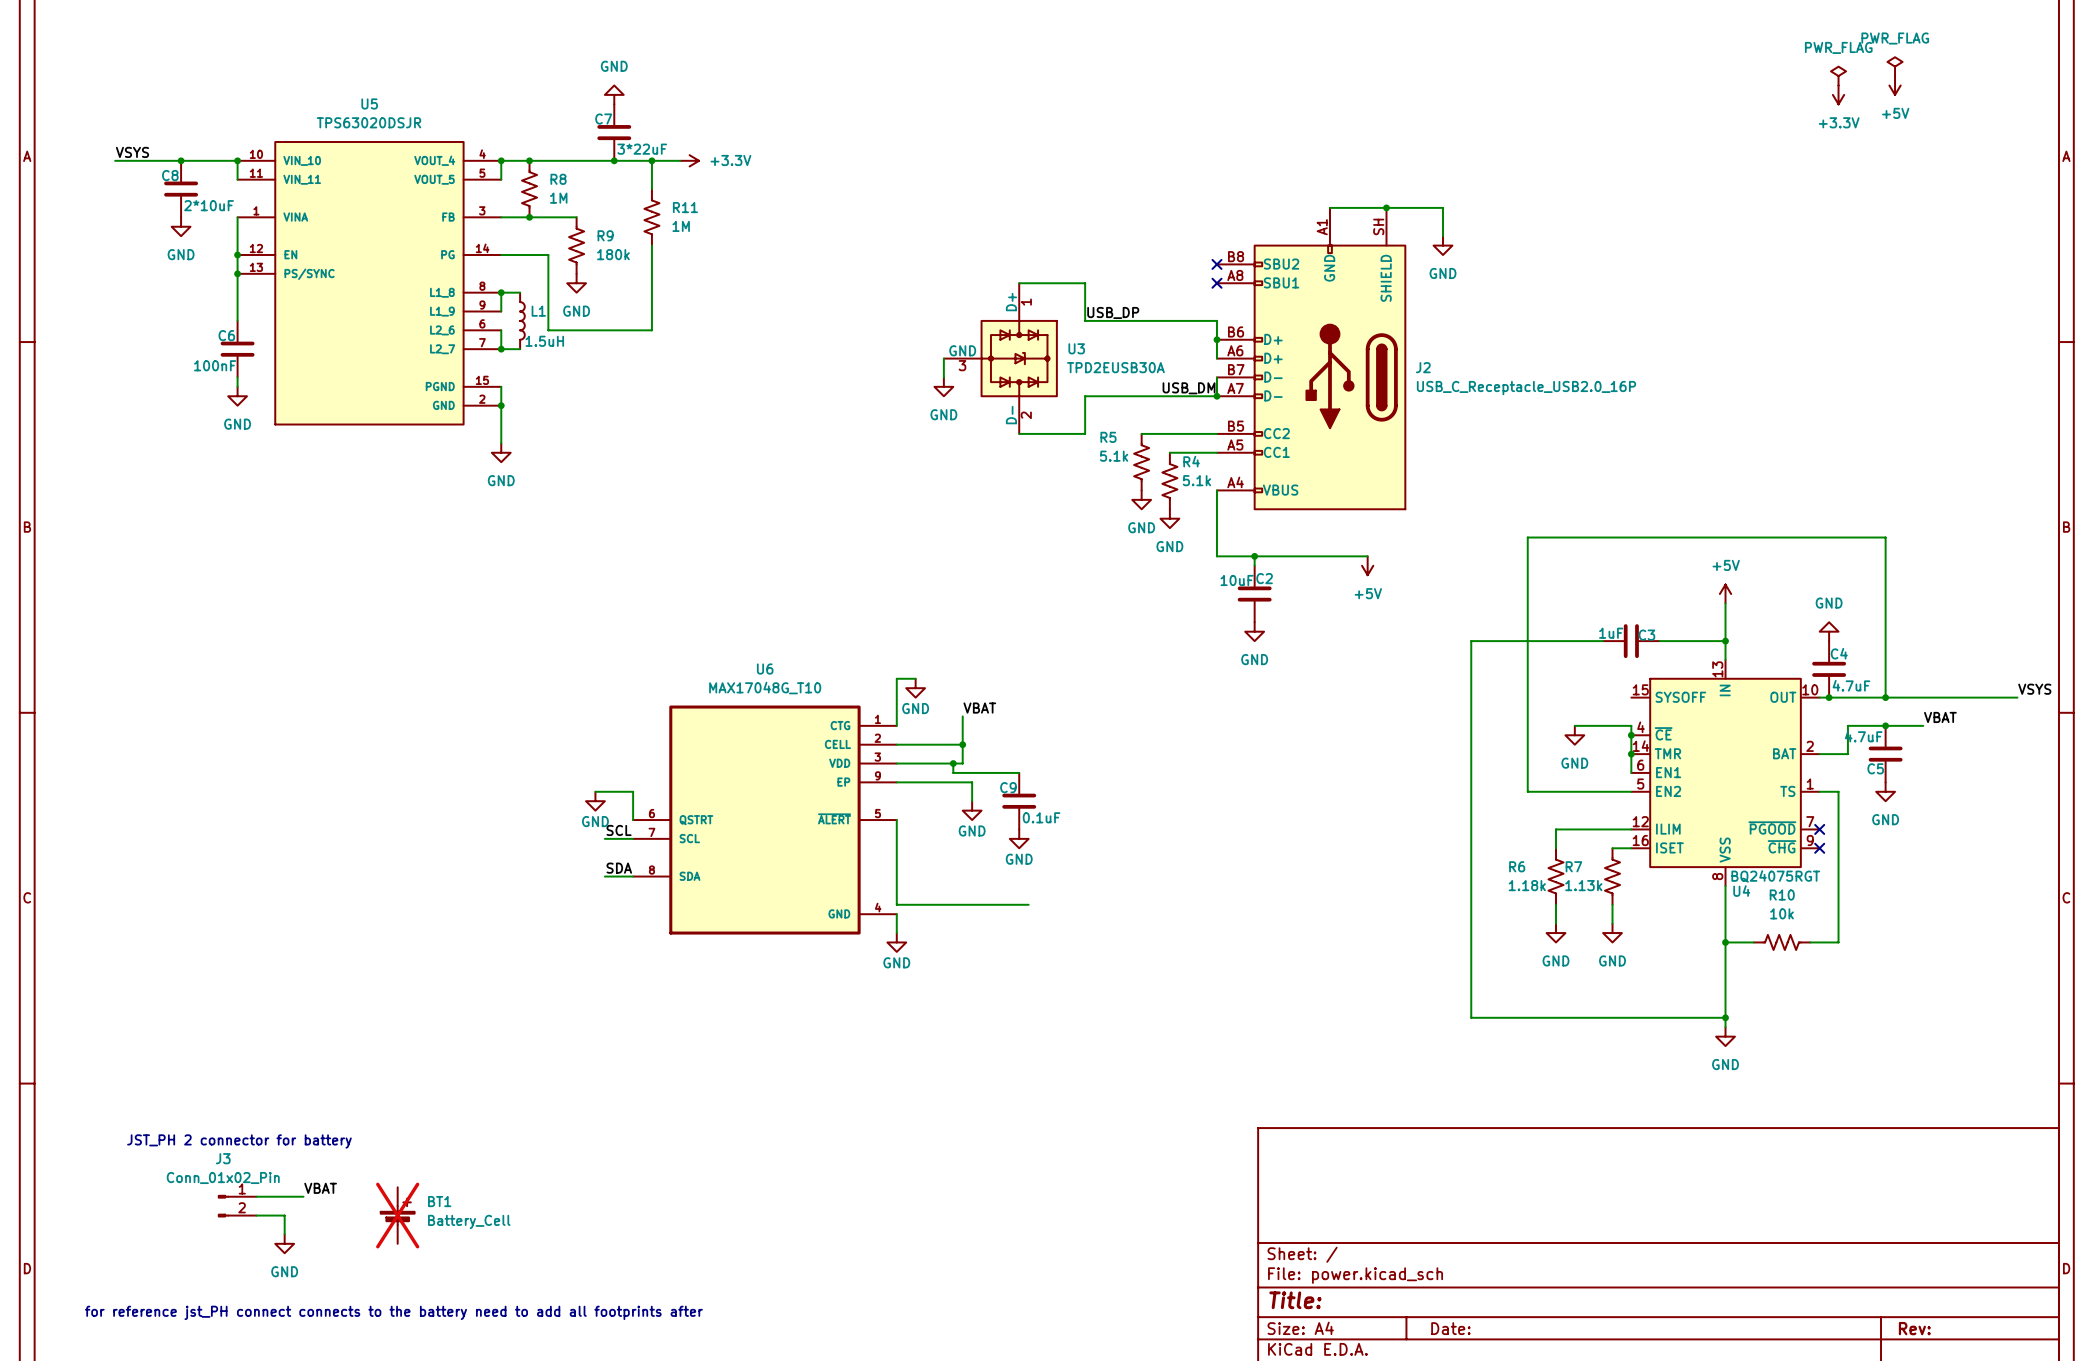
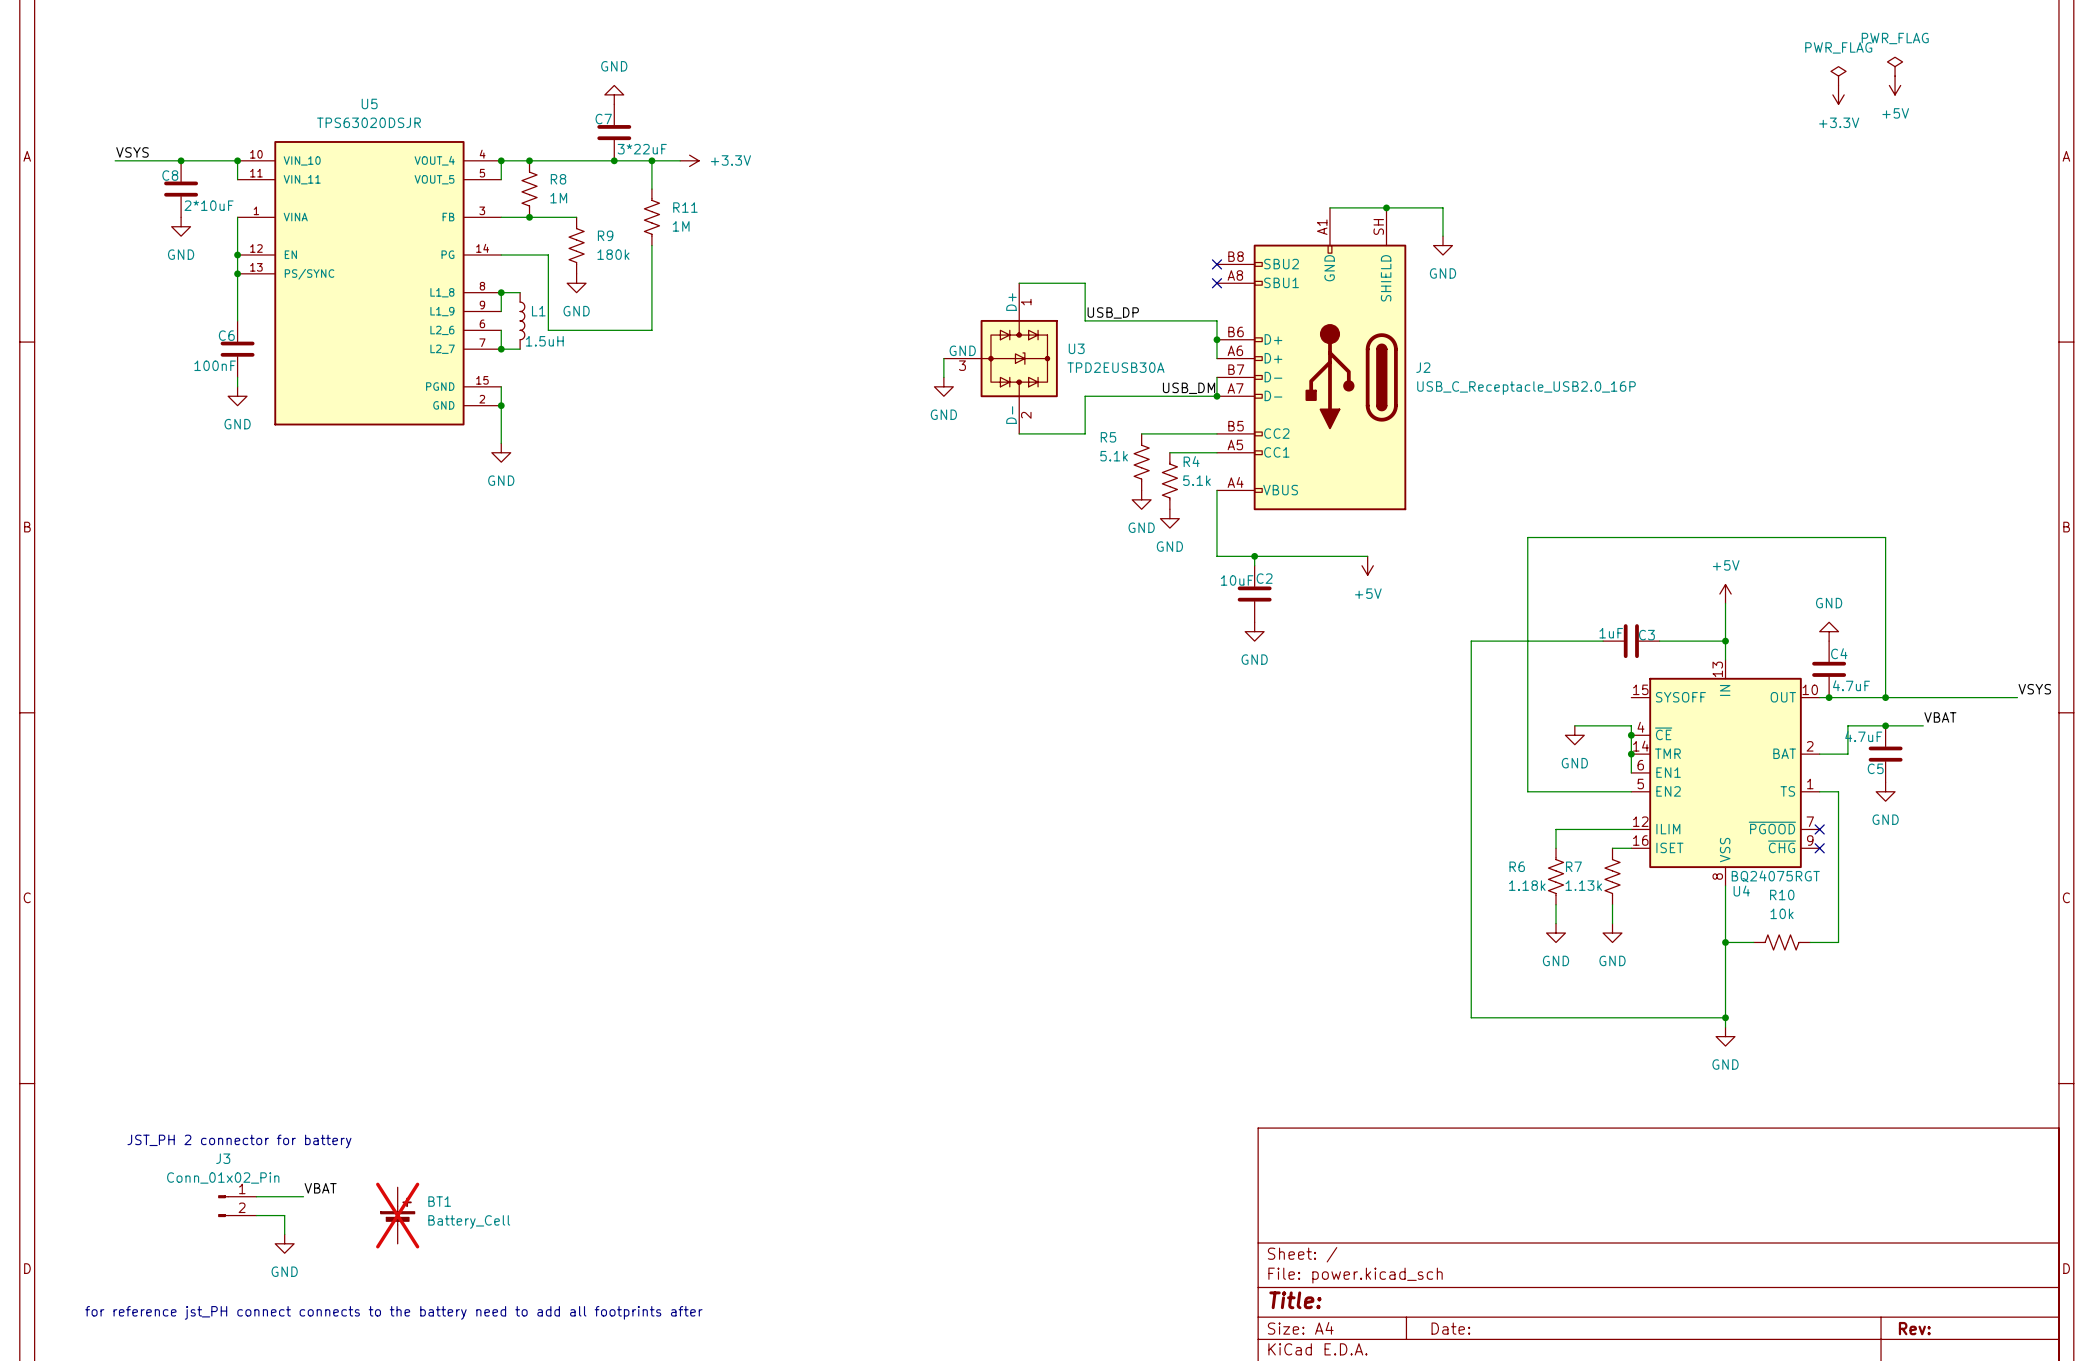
wire: (915, 678) (896, 678) (896, 725) -> none
power symbol: GND (915, 688) -> none
label: VBAT (979, 708) -> none
wire: (962, 716) (962, 763) (896, 763) -> none
wire: (896, 744) (962, 744) -> none
junction: (962, 744) -> none
wire: (953, 763) (953, 772) (1019, 772) -> none
junction: (953, 763) -> none
wire: (896, 782) (972, 782) (972, 801) -> none
wire: (595, 791) (633, 791) (633, 820) -> none
power symbol: GND (595, 801) -> none
C9: 0.1uF (1019, 801) -> none
power symbol: GND (972, 810) -> none
U6: MAX17048G_T10 (764, 820) -> none
wire: (896, 820) (896, 904) (1028, 904) -> none
label: SCL (619, 830) -> none
wire: (604, 838) (633, 838) -> none
power symbol: GND (1019, 838) -> none
label: SDA (619, 868) -> none
wire: (604, 876) (633, 876) -> none
wire: (896, 914) (896, 933) -> none
power symbol: GND (896, 942) -> none

